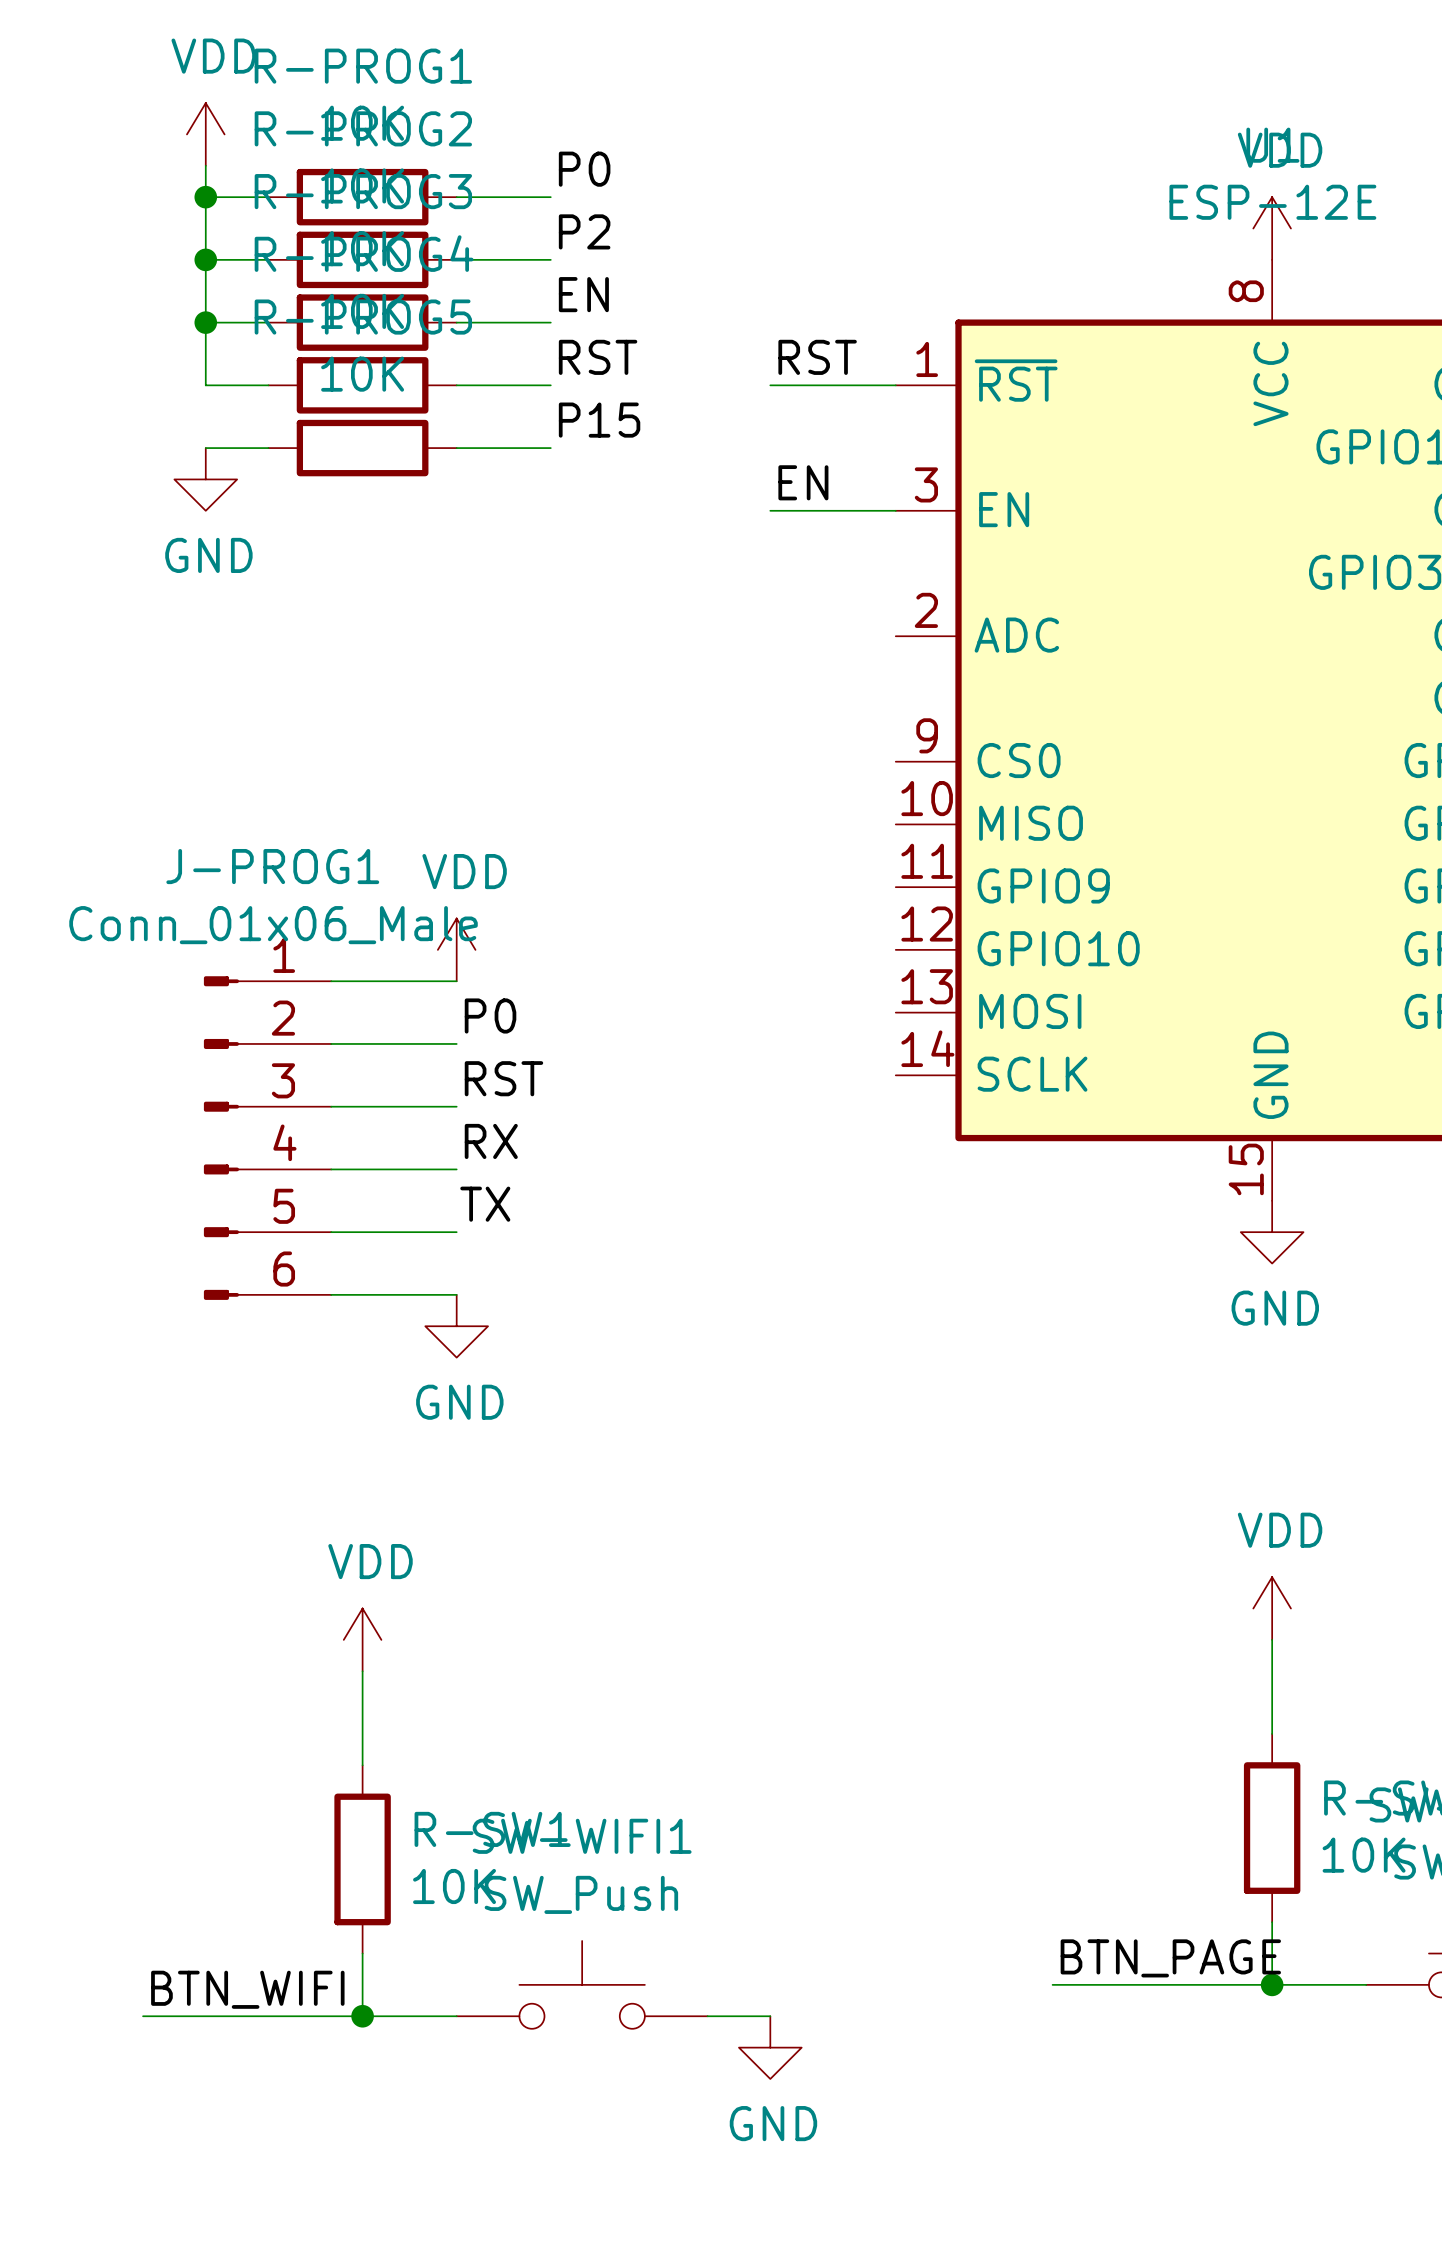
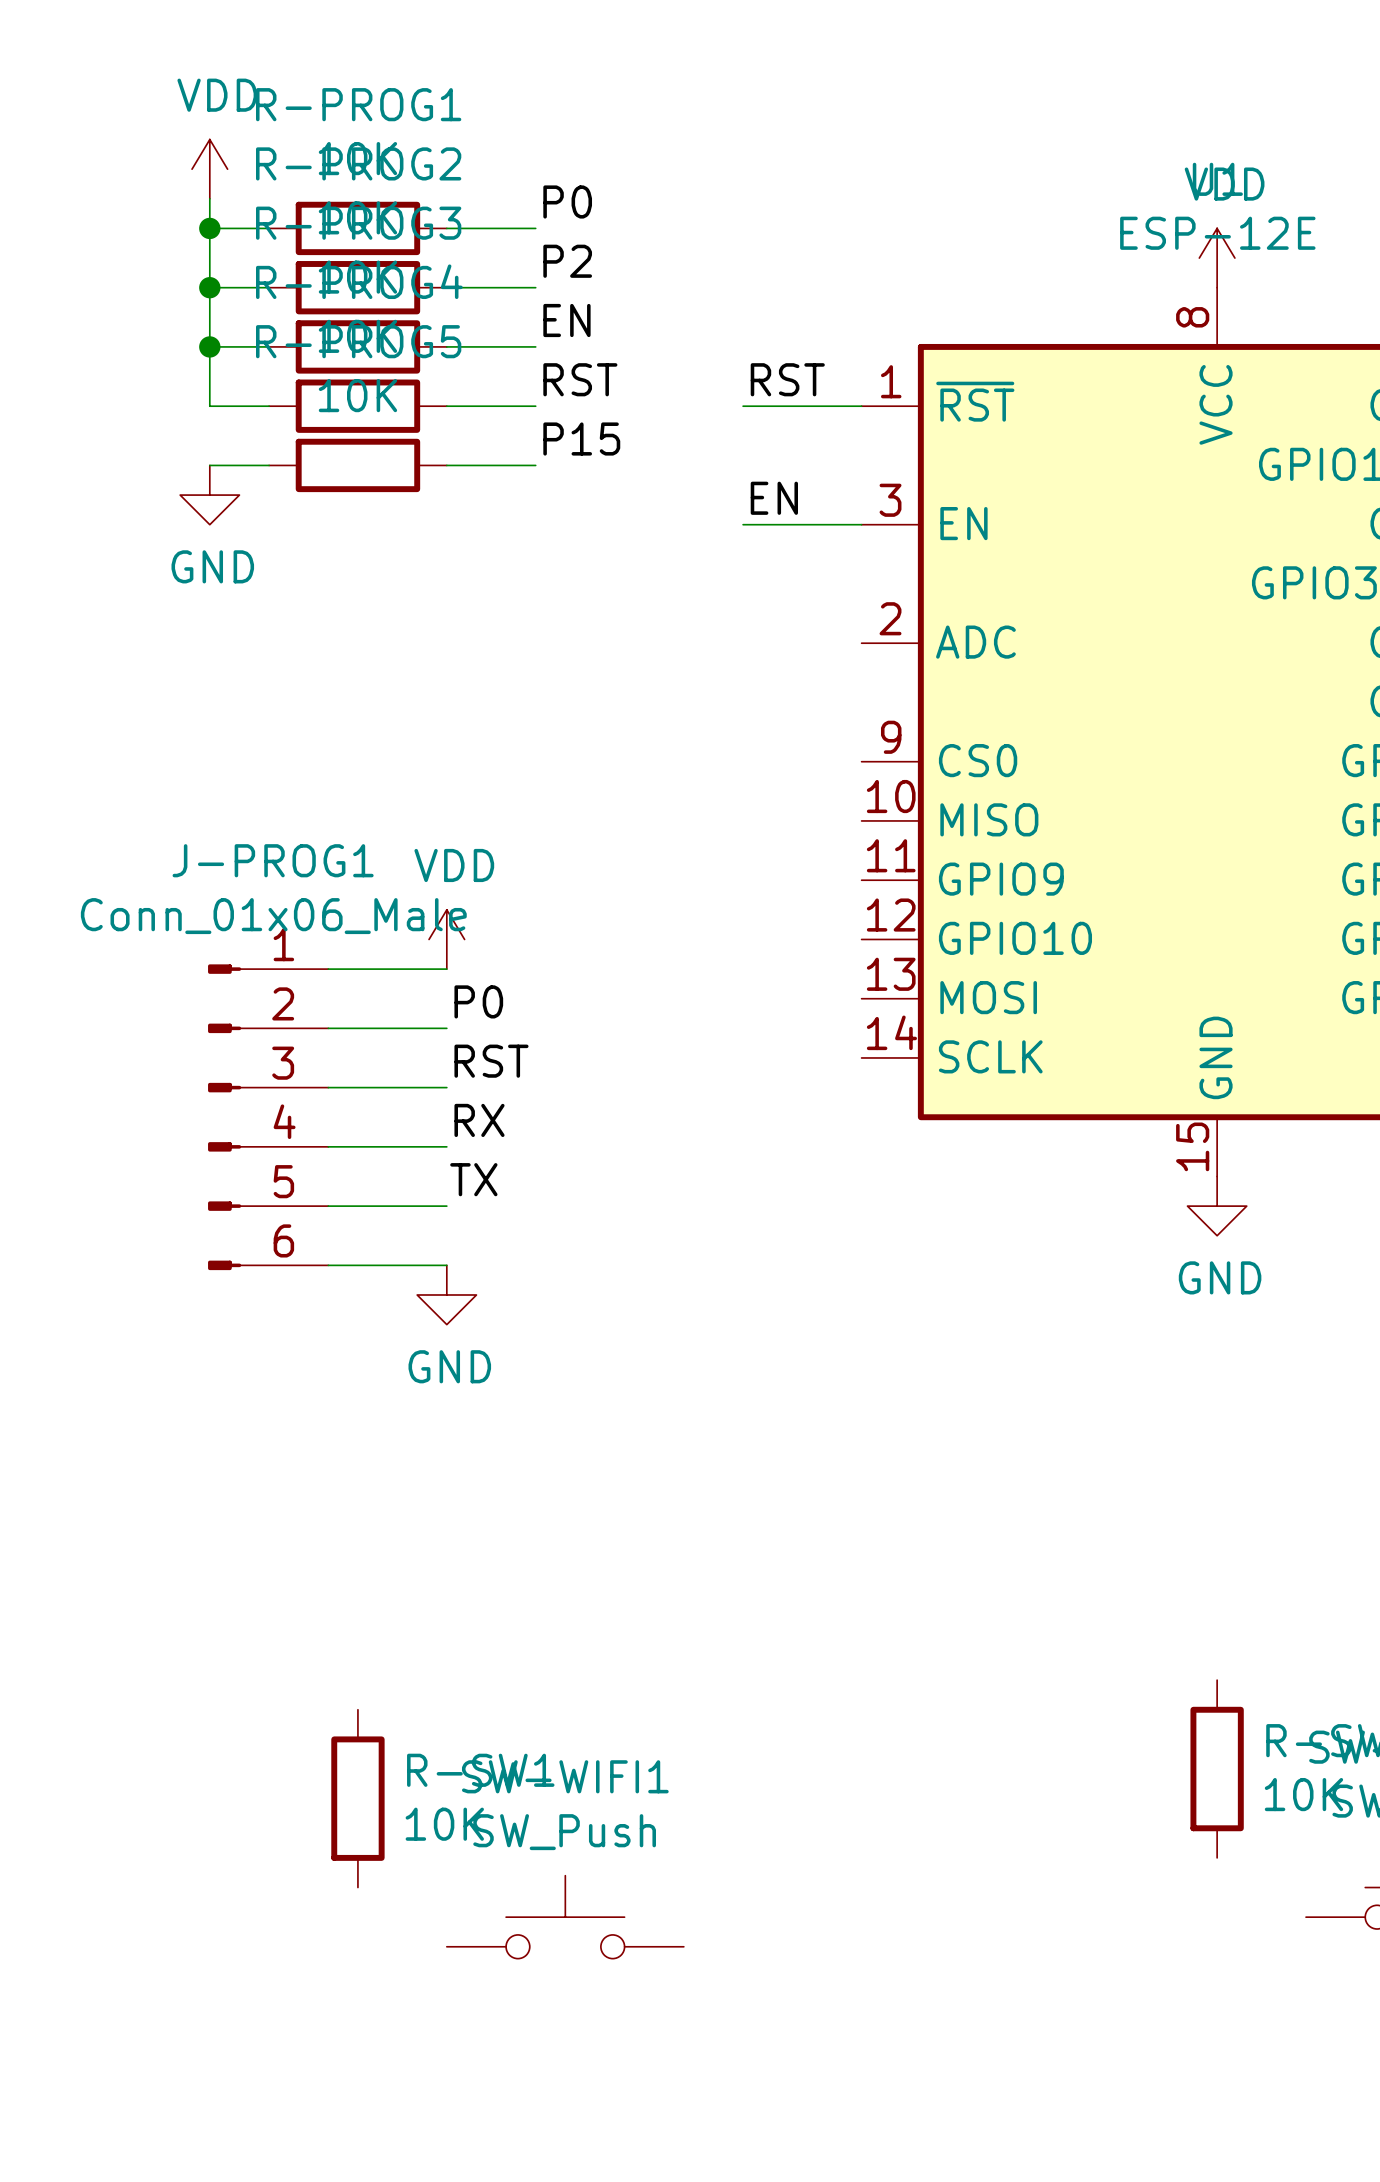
power symbol: VDD (1272, 1608) -> none
power symbol: VDD (362, 1639) -> none
wire: (1272, 1639) (1272, 1733) -> none
wire: (362, 1671) (362, 1765) -> none
wire: (1272, 1922) (1272, 1984) -> none
wire: (362, 1953) (362, 2016) -> none
label: BTN_PAGE (1170, 1958) -> none
wire: (1052, 1984) (1366, 1984) -> none
junction: (1272, 1984) -> none
label: BTN_WIFI (247, 1989) -> none
wire: (143, 2016) (456, 2016) -> none
junction: (362, 2016) -> none
wire: (707, 2016) (770, 2016) -> none
power symbol: GND (770, 2047) -> none

